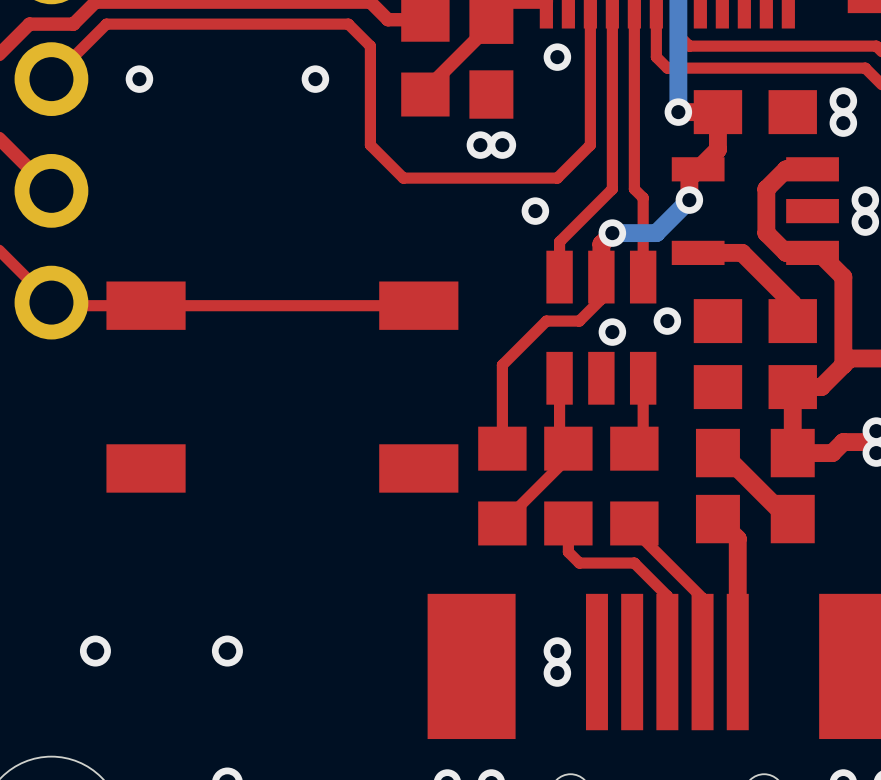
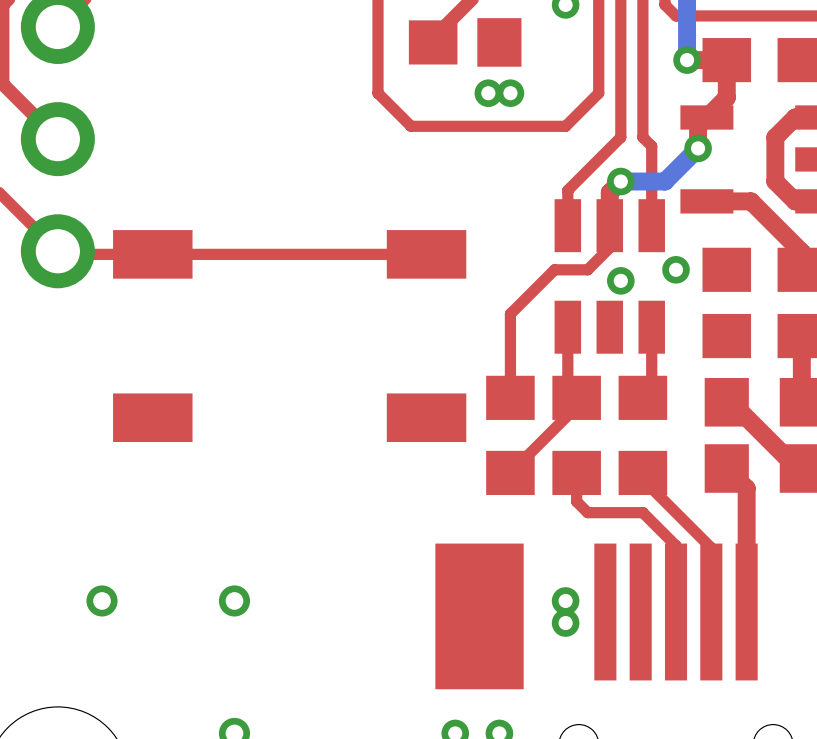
via: (139, 79) -> none
via: (315, 79) -> none
via: (535, 211) -> none

